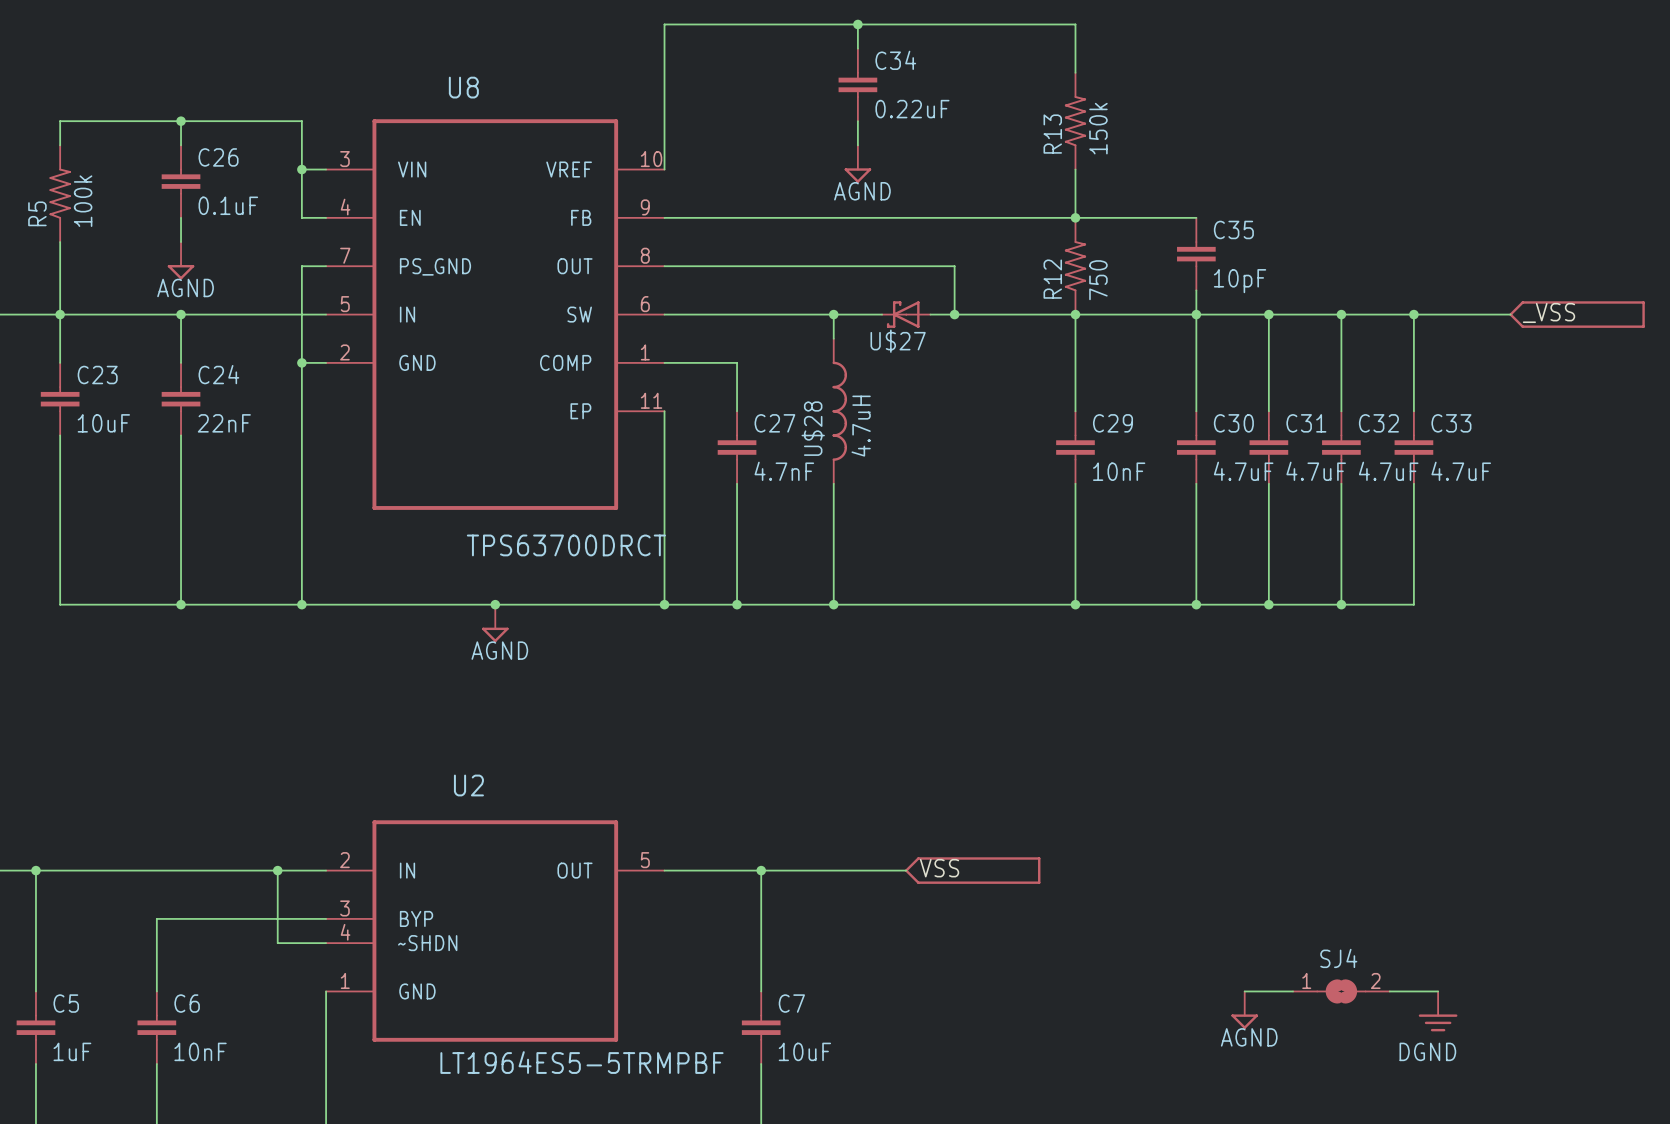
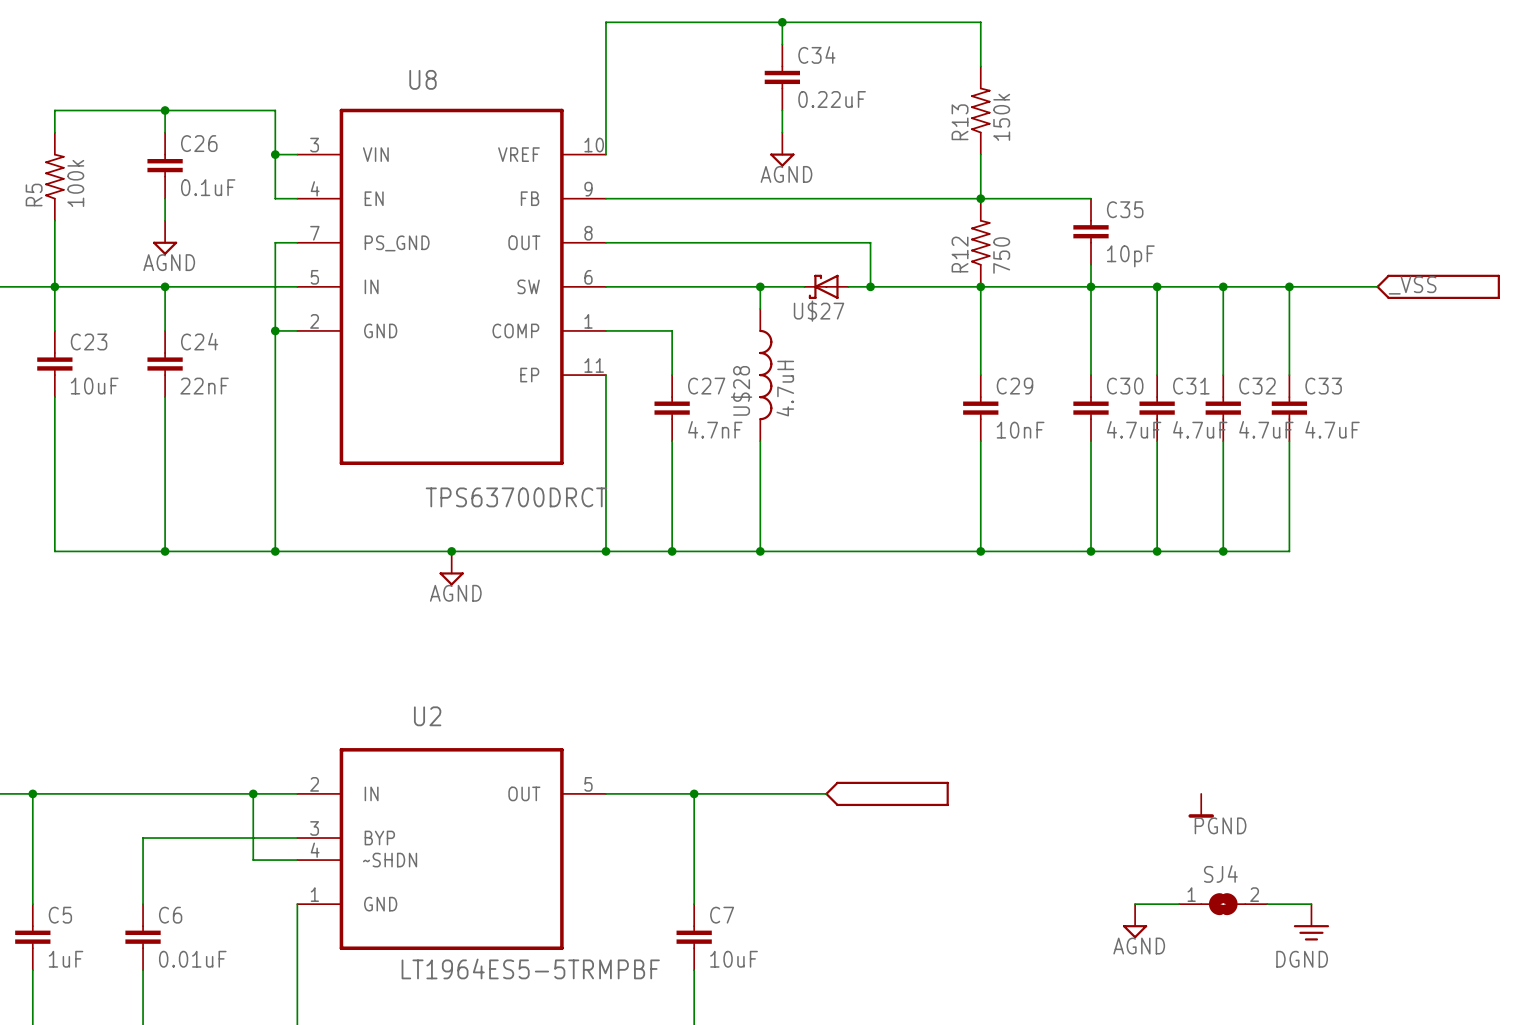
label: VSS (939, 868) -> none
power symbol: none -> PGND (1201, 805)
C6 value: 10nF (200, 1051) -> 0.01uF (192, 959)

